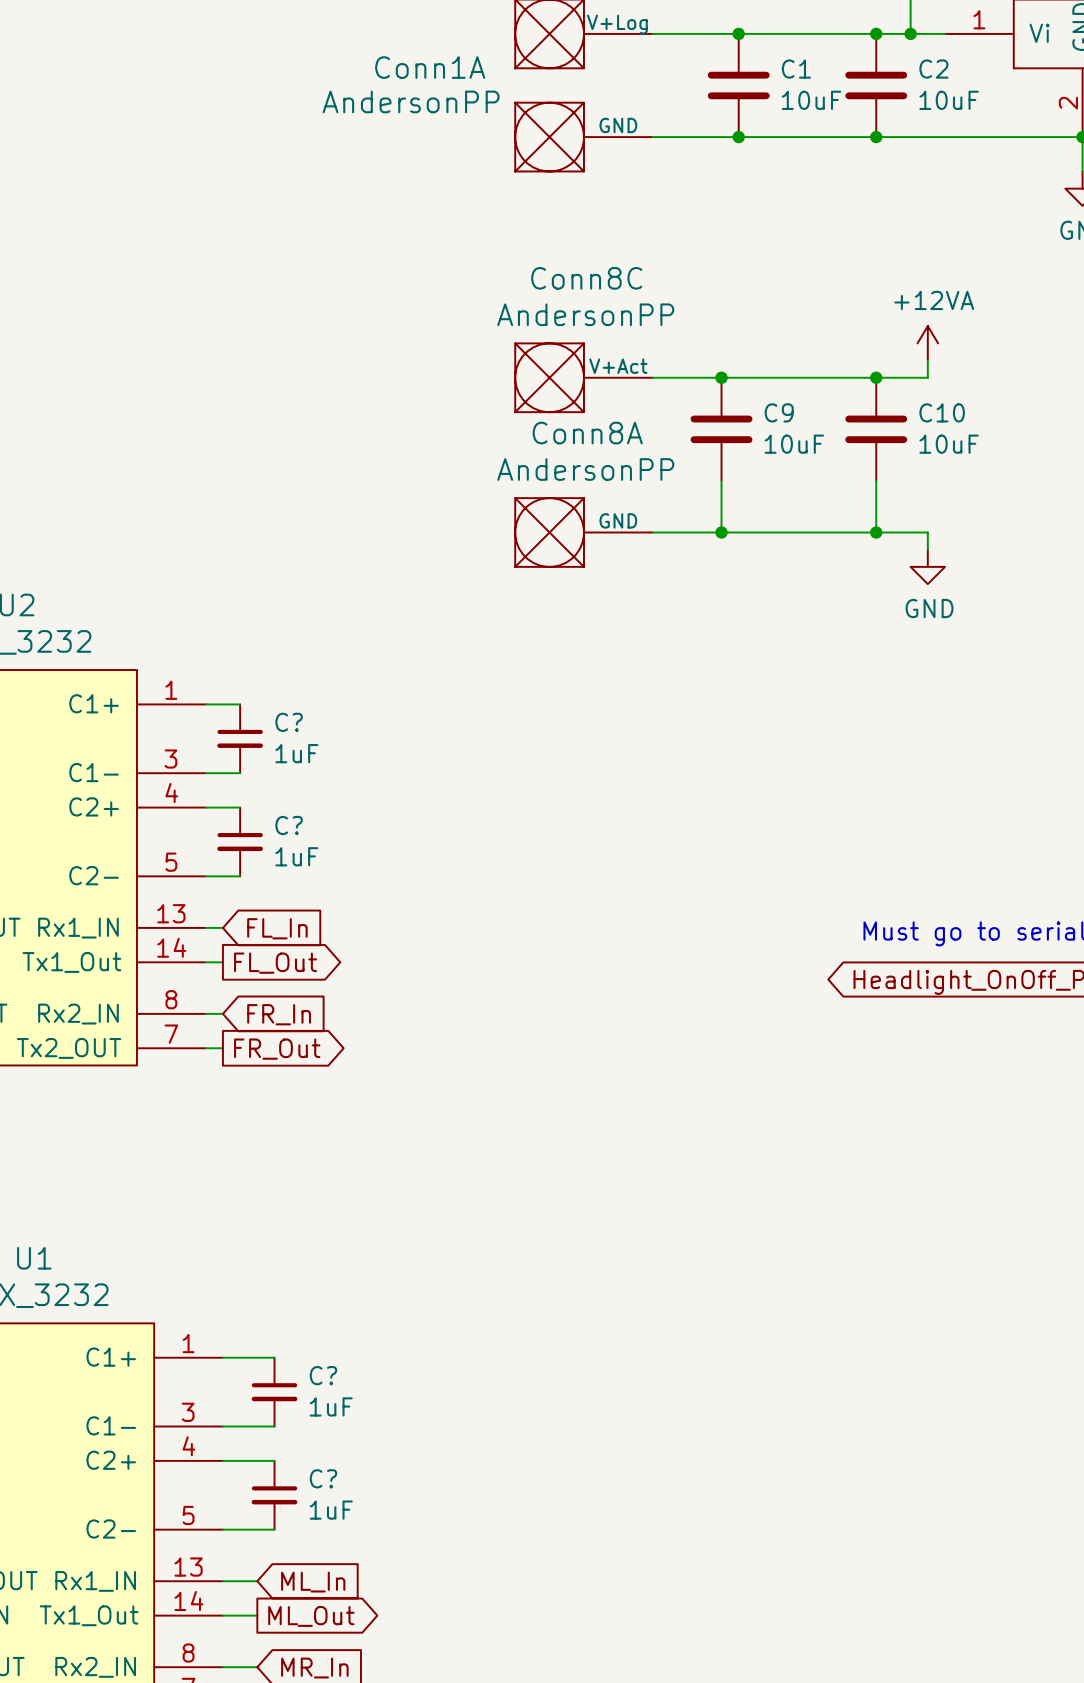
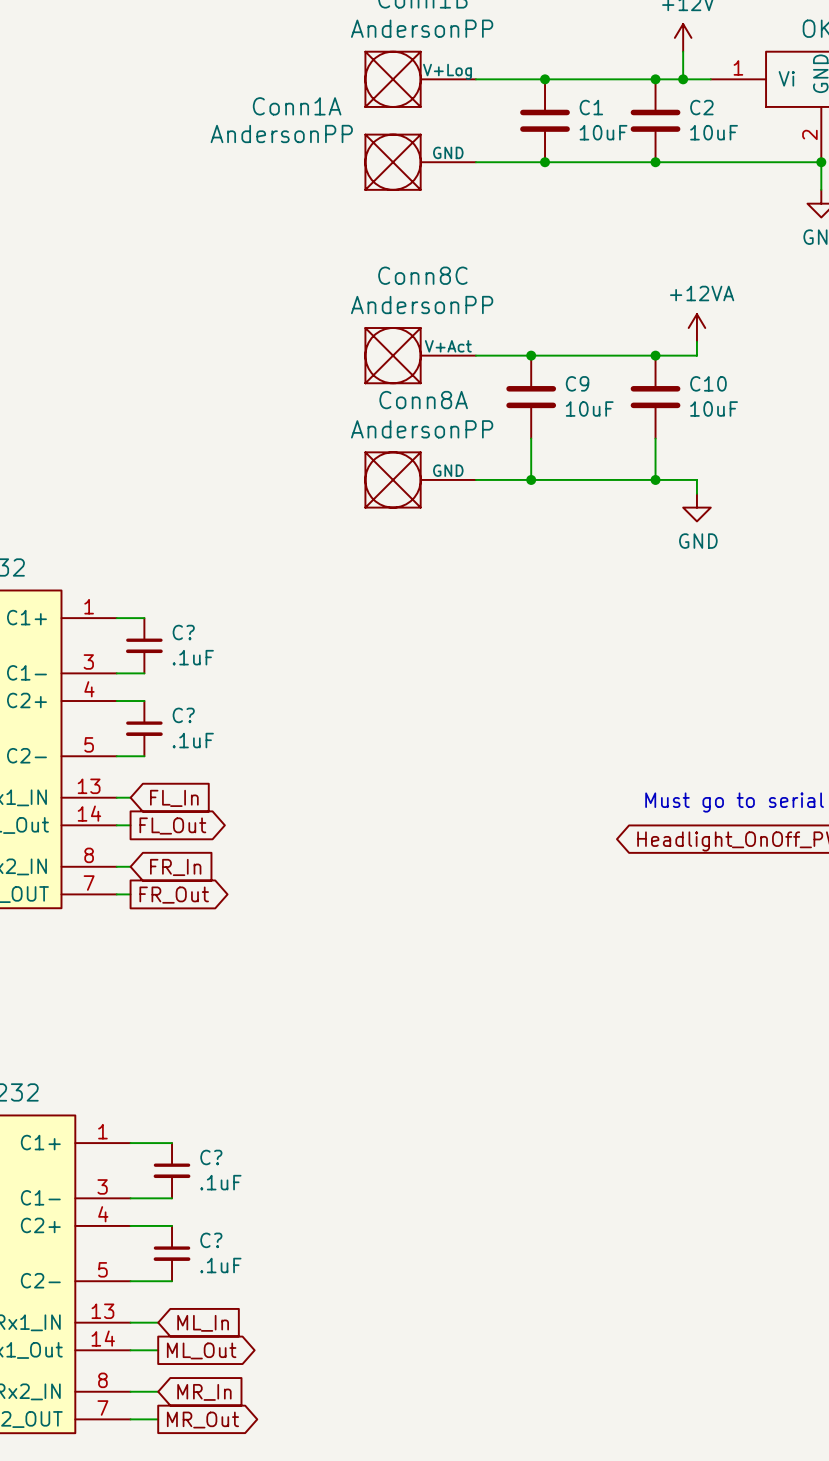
C? value: 1uF (296, 753) -> .1uF (193, 657)
C? value: 1uF (296, 856) -> .1uF (193, 740)
C? value: 1uF (331, 1406) -> .1uF (220, 1182)
C? value: 1uF (331, 1510) -> .1uF (220, 1265)

